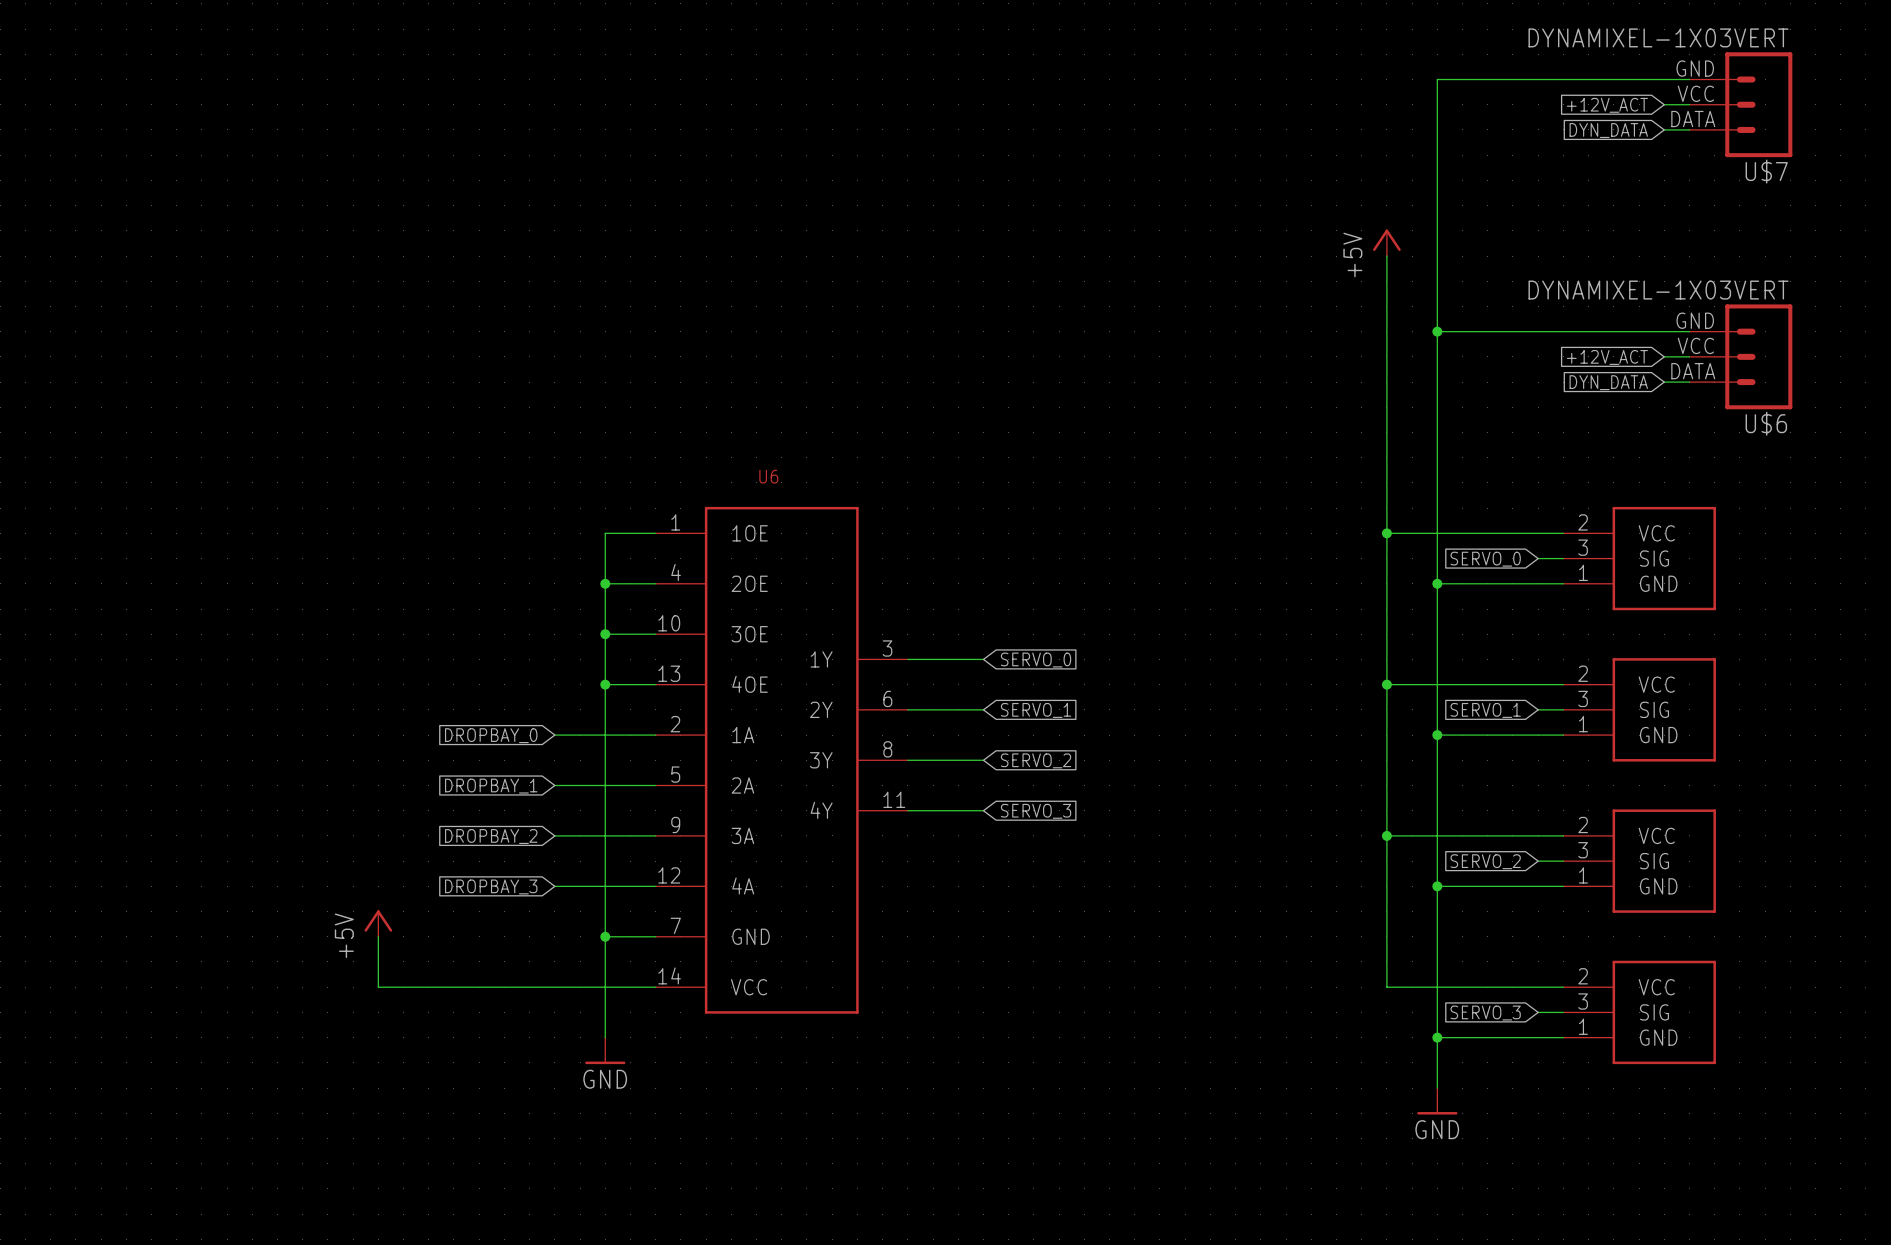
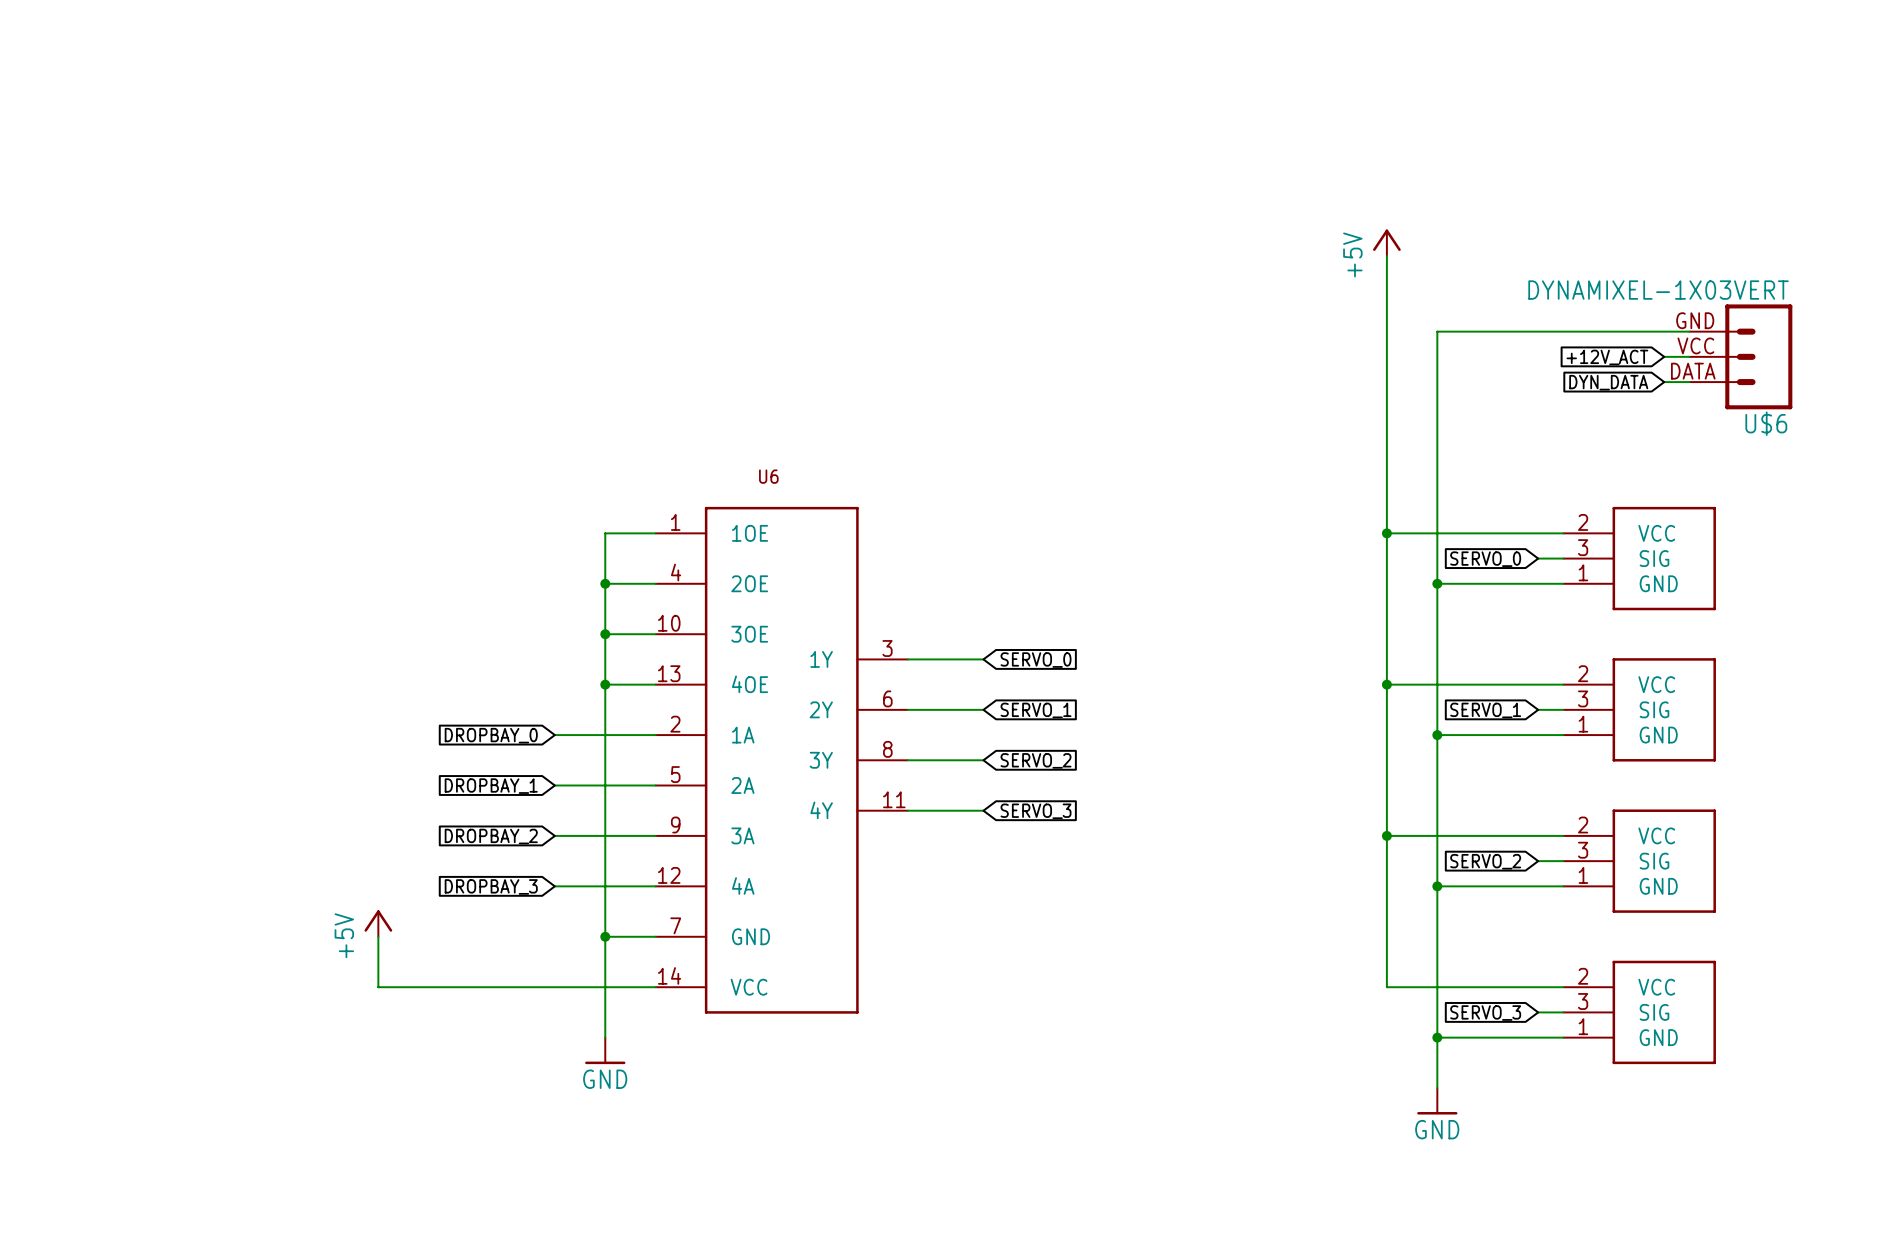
wire: (1689, 79) (1437, 79) (1437, 331) -> none
wire: (1664, 104) (1689, 104) -> none
U$7: DYNAMIXEL-1X03VERT (1740, 104) -> none
global label: +12V_ACT (1607, 105) -> none
wire: (1664, 129) (1689, 129) -> none
global label: DYN_DATA (1608, 130) -> none
junction: (1437, 331) -> none

